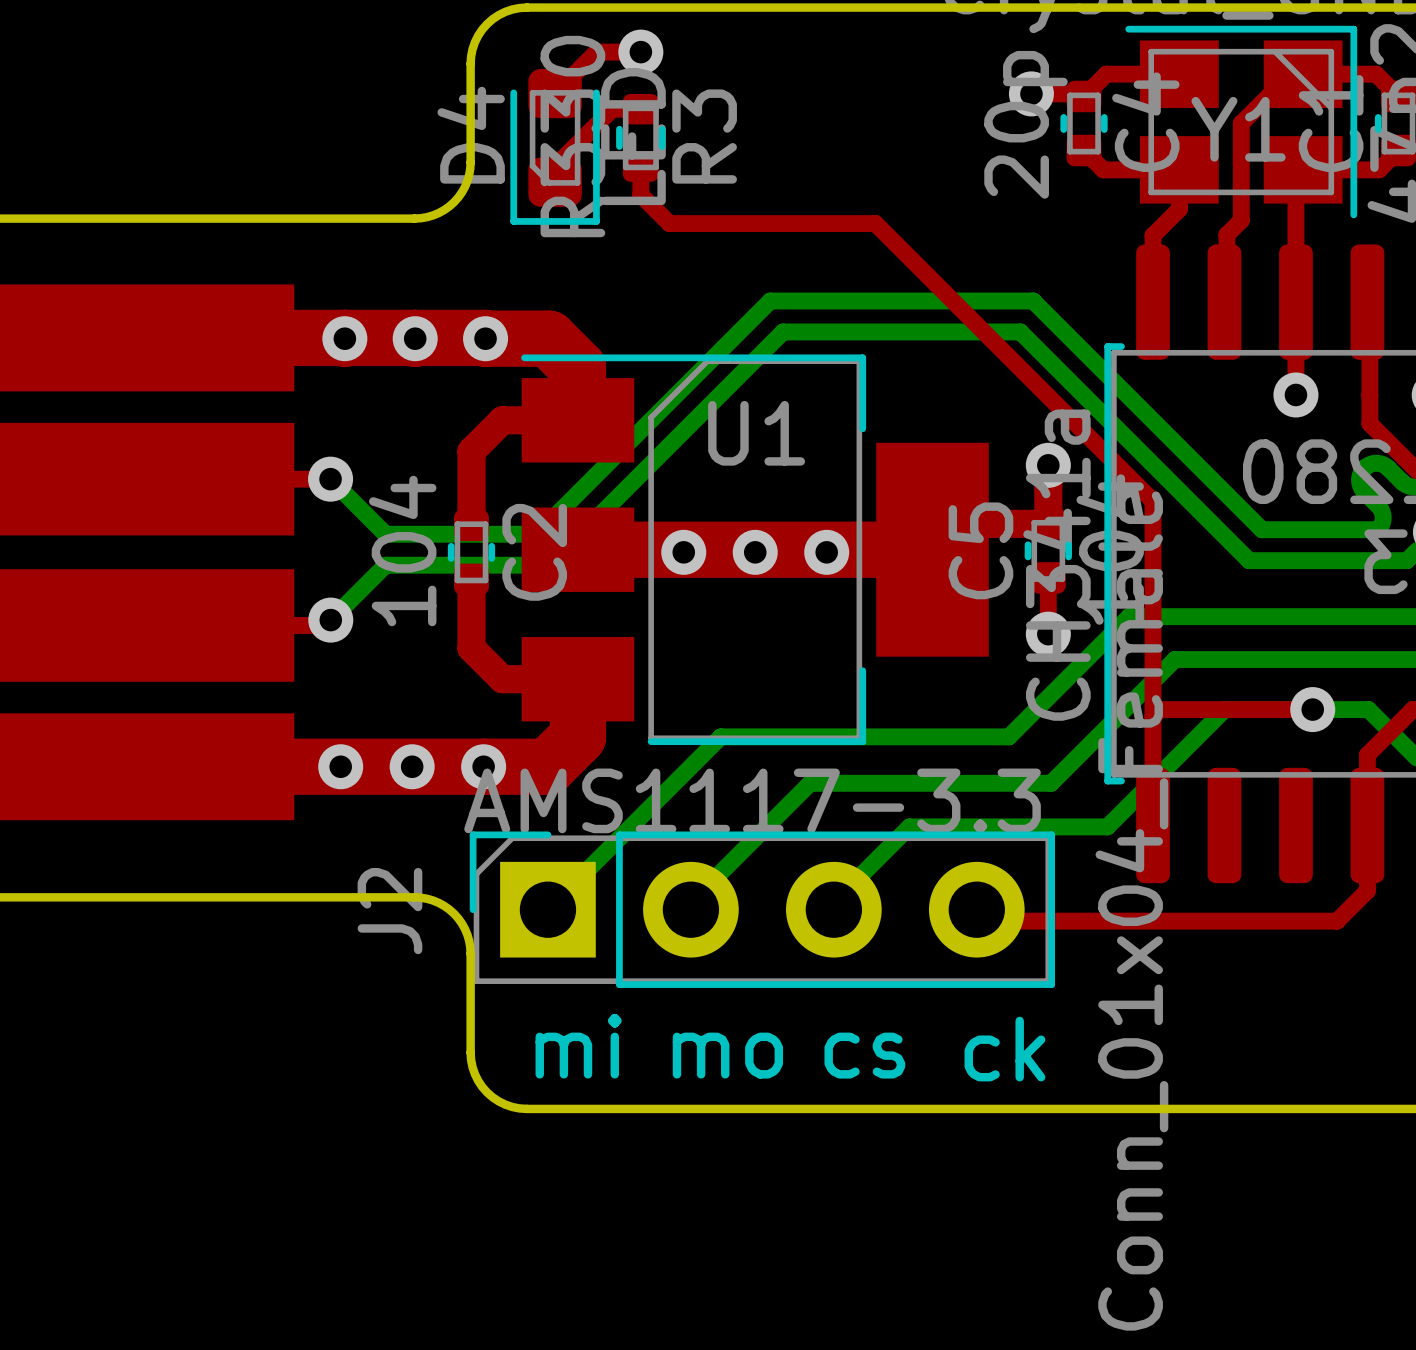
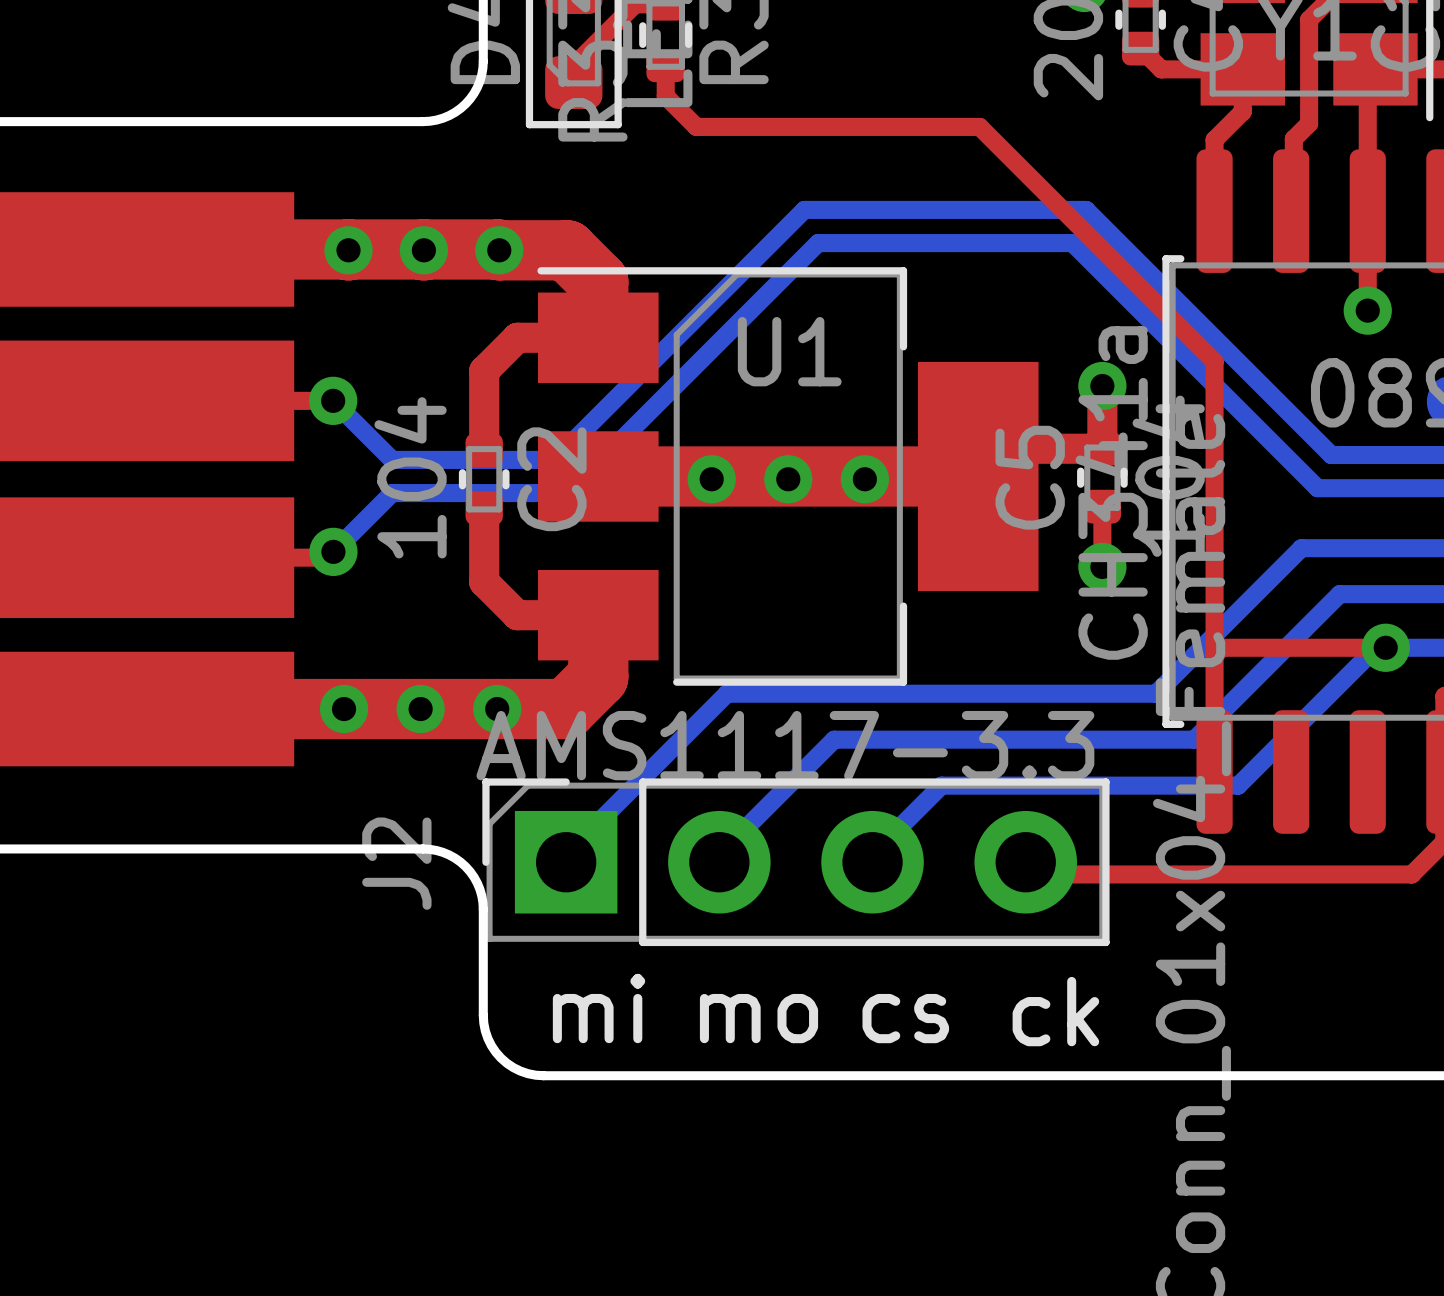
top track: (875, 223) (1153, 501) -> (917, 126) (979, 126) (1214, 361) (1214, 424)
bottom track: (1234, 616) (1129, 616) (1008, 736) (720, 736) (547, 909) -> (1301, 548) (1155, 693) (727, 693) (566, 854) (566, 862)
bottom track: (1269, 659) (1174, 659) (1051, 783) (810, 783) (798, 795) -> (1339, 594) (1194, 739) (834, 739)
bottom track: (1303, 709) (1224, 709) (1107, 826) (909, 826) (898, 838) -> (1376, 647) (1238, 785) (941, 785)

